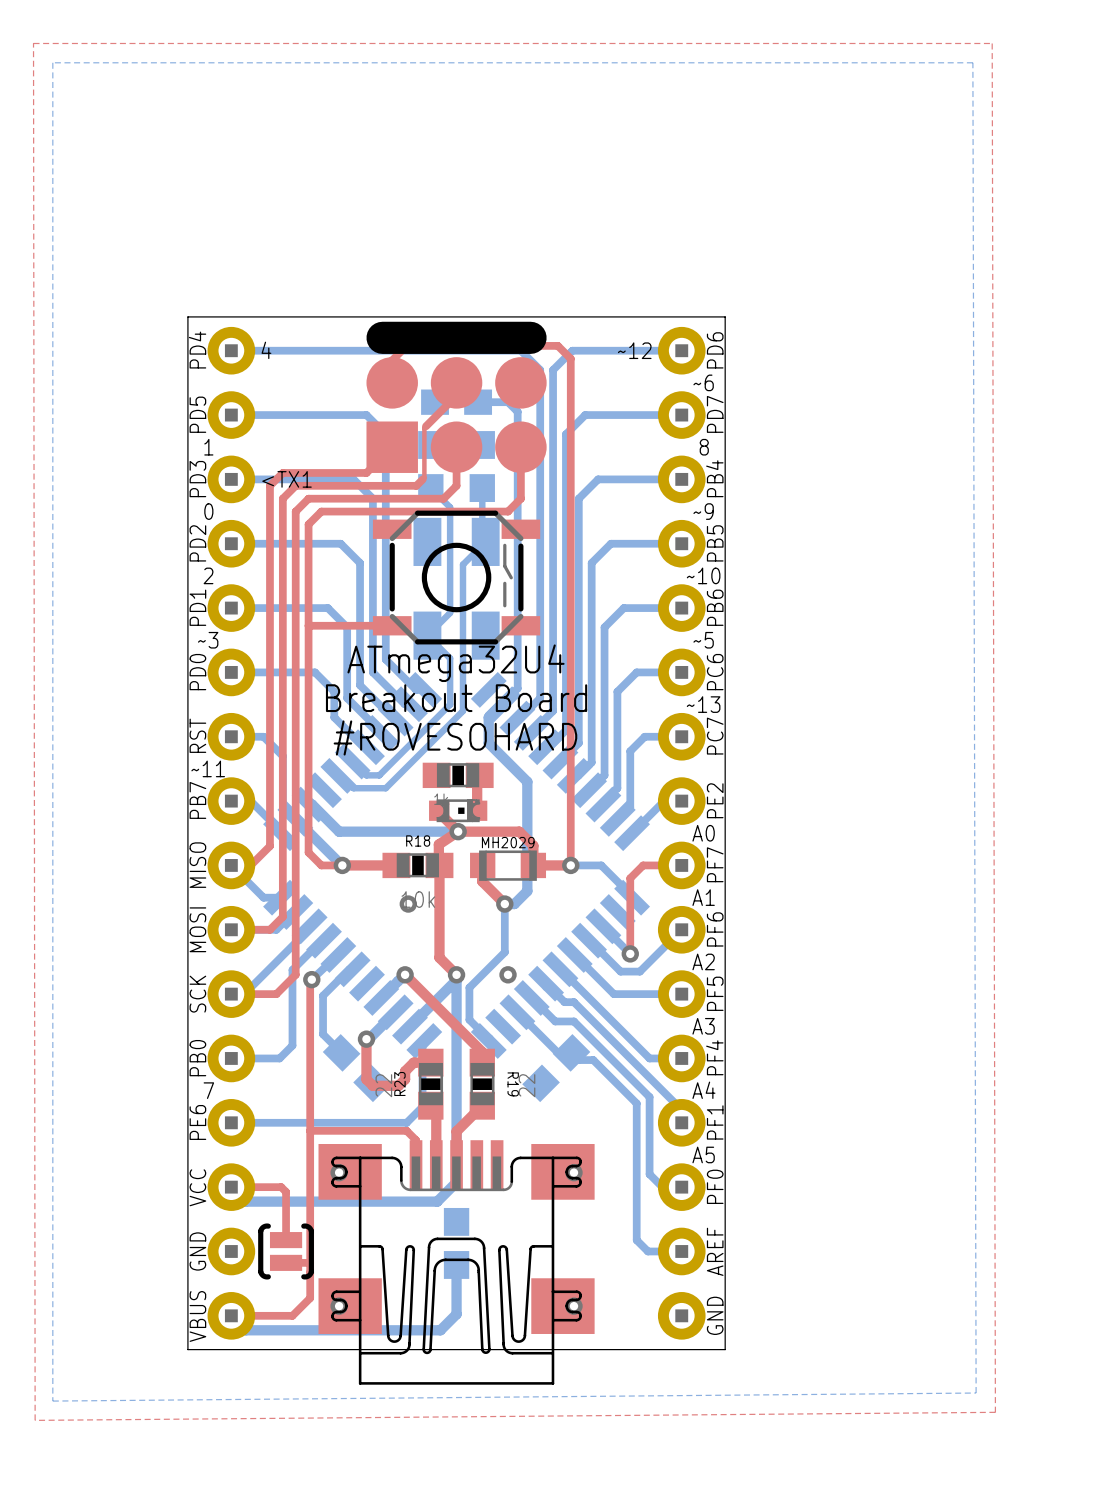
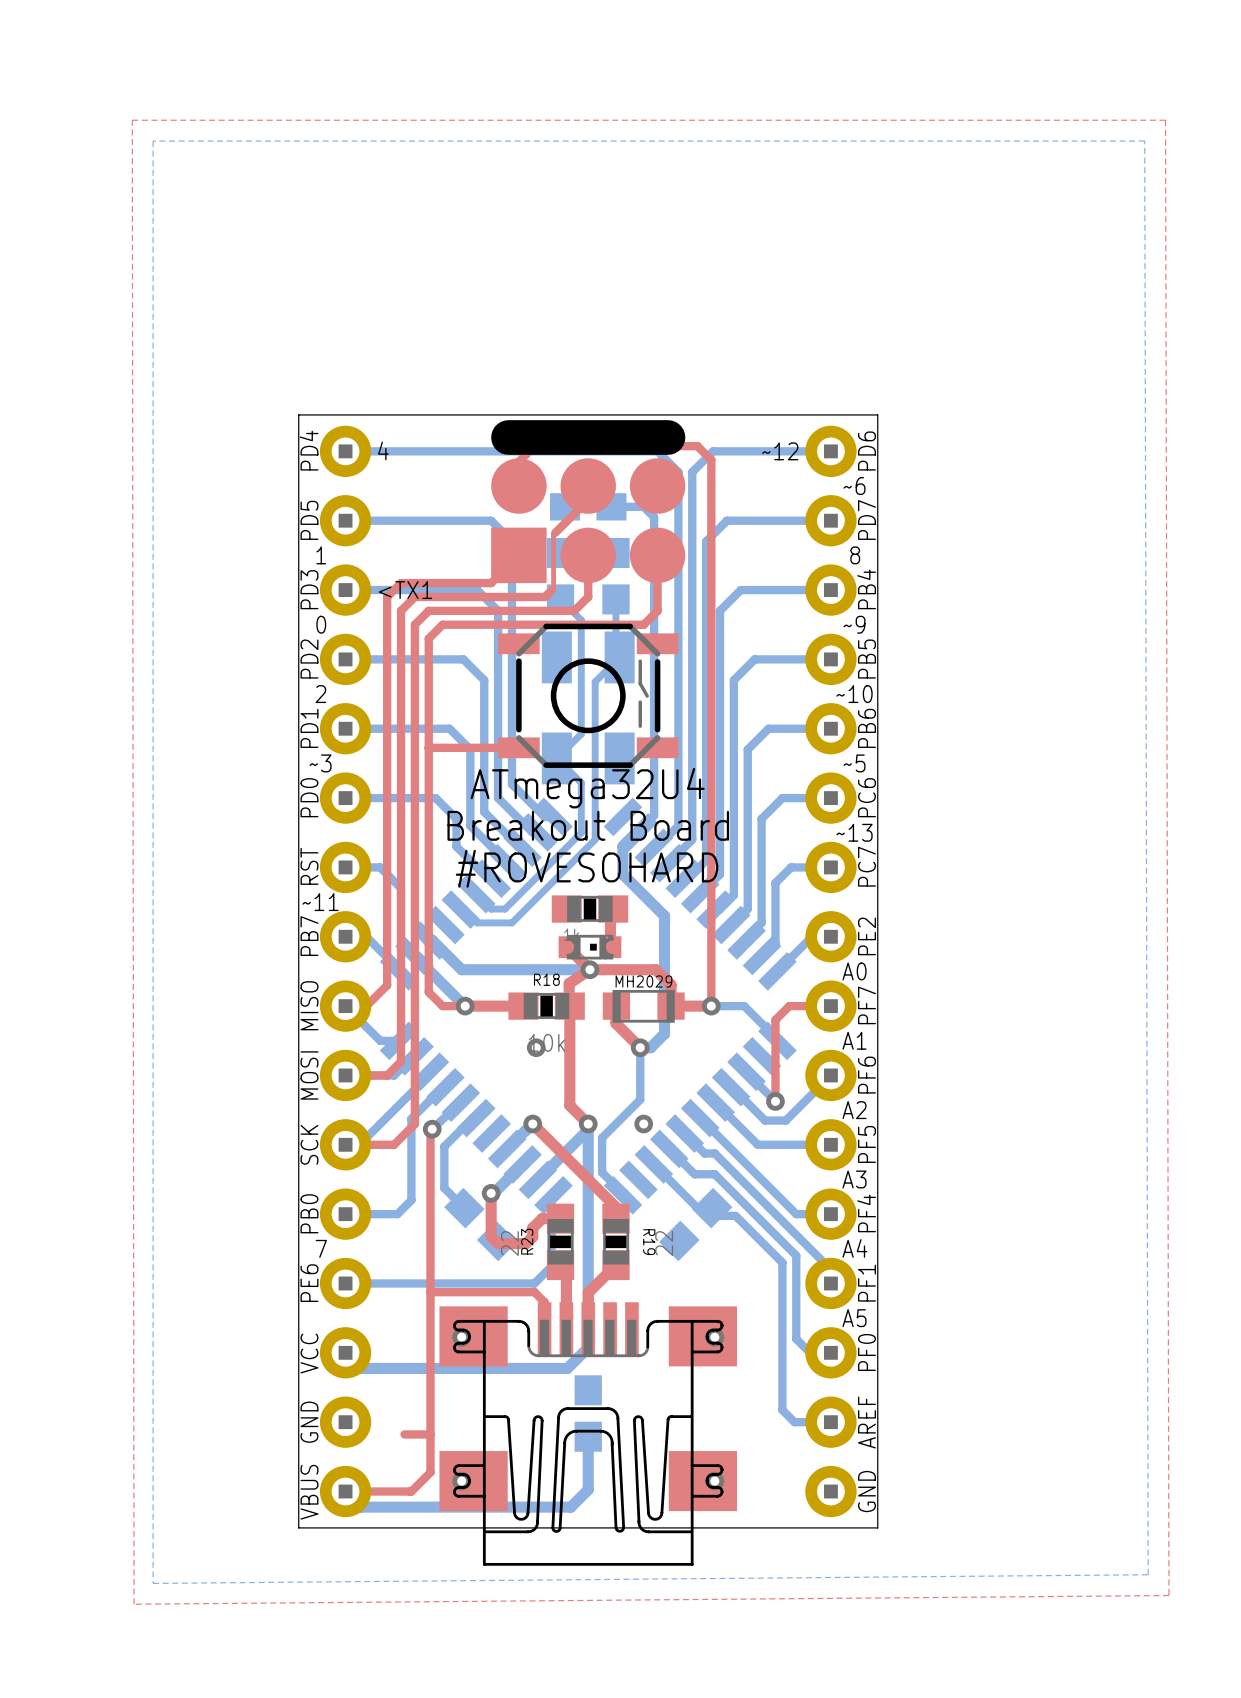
top track: (231, 1187) (281, 1187) (286, 1191) (286, 1240) -> none
part: (286, 1251) -> none

